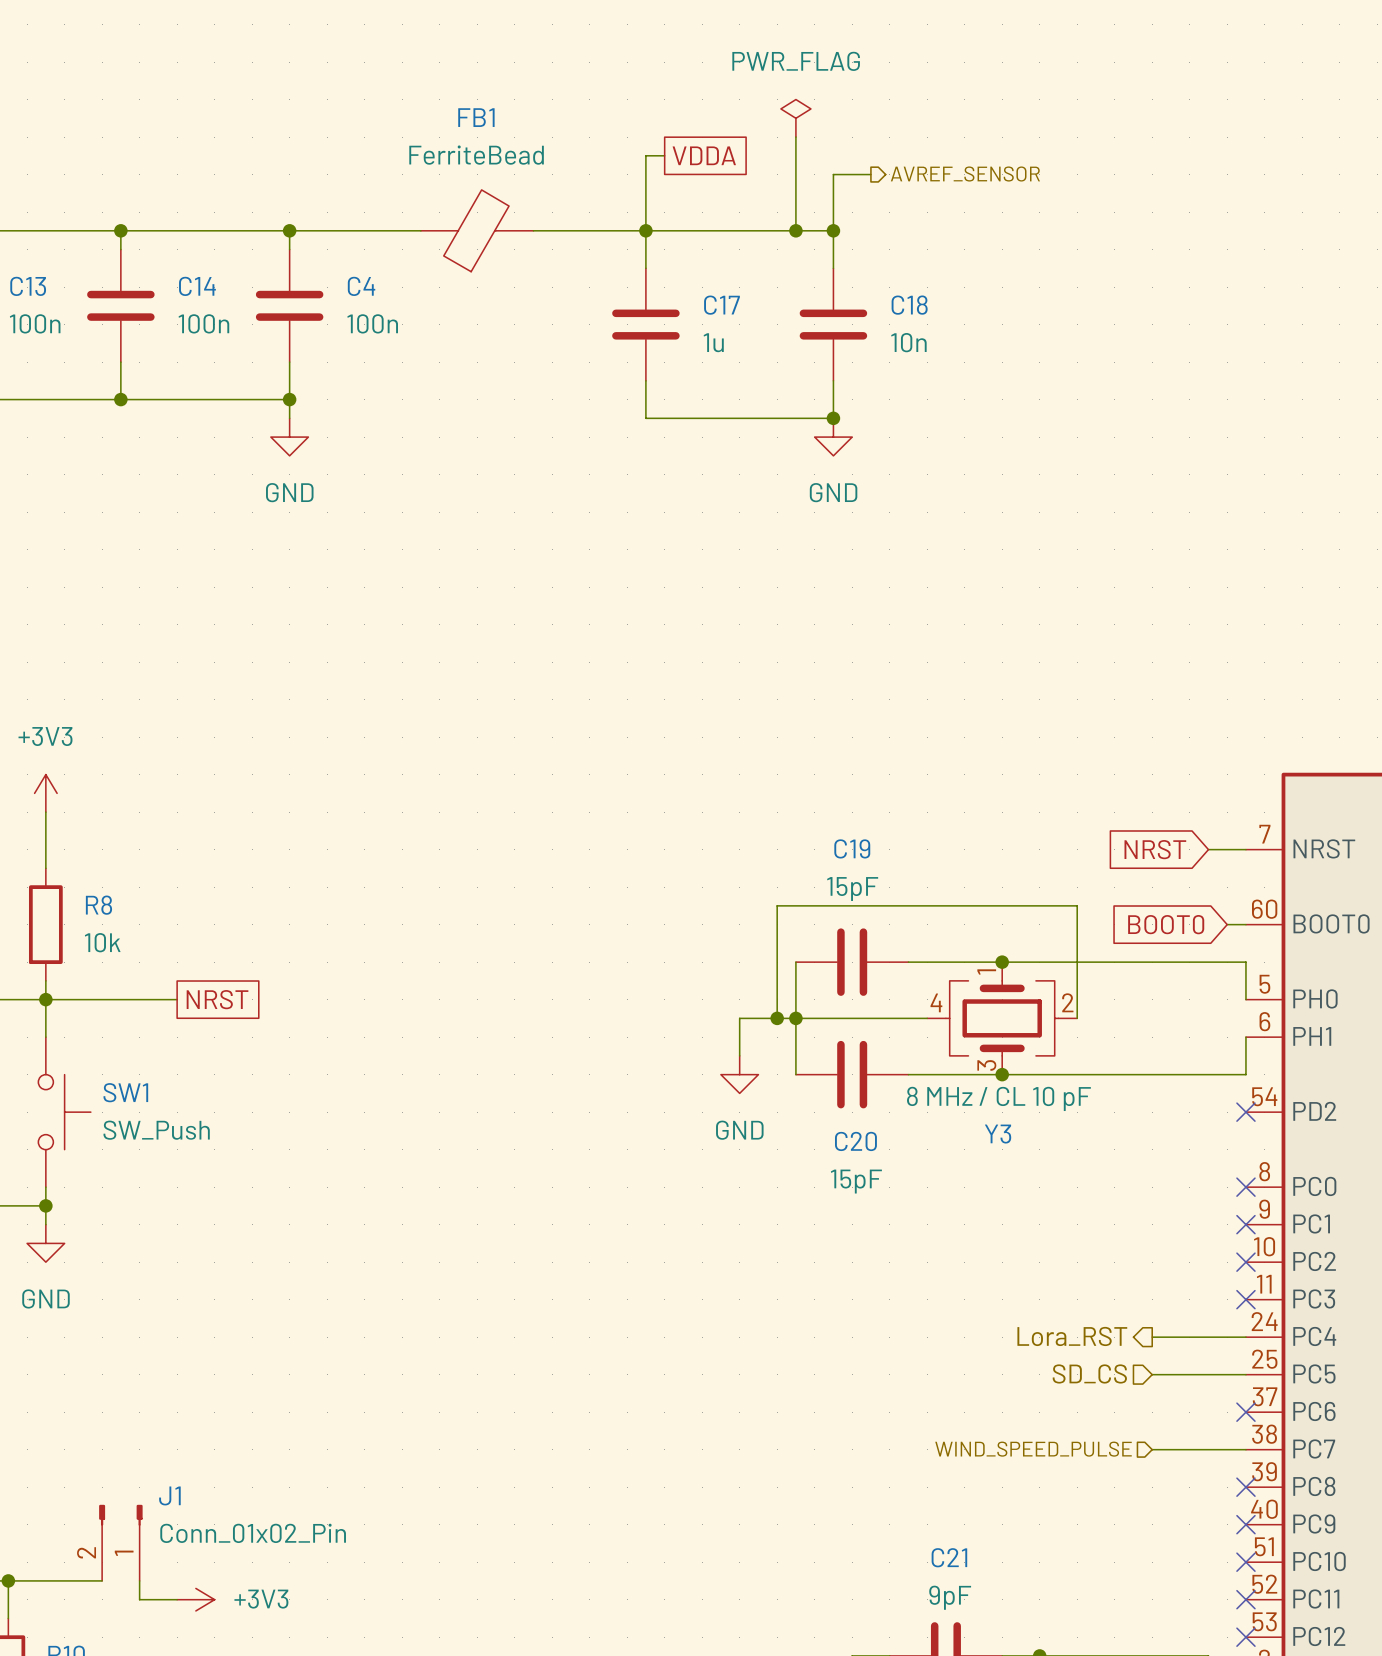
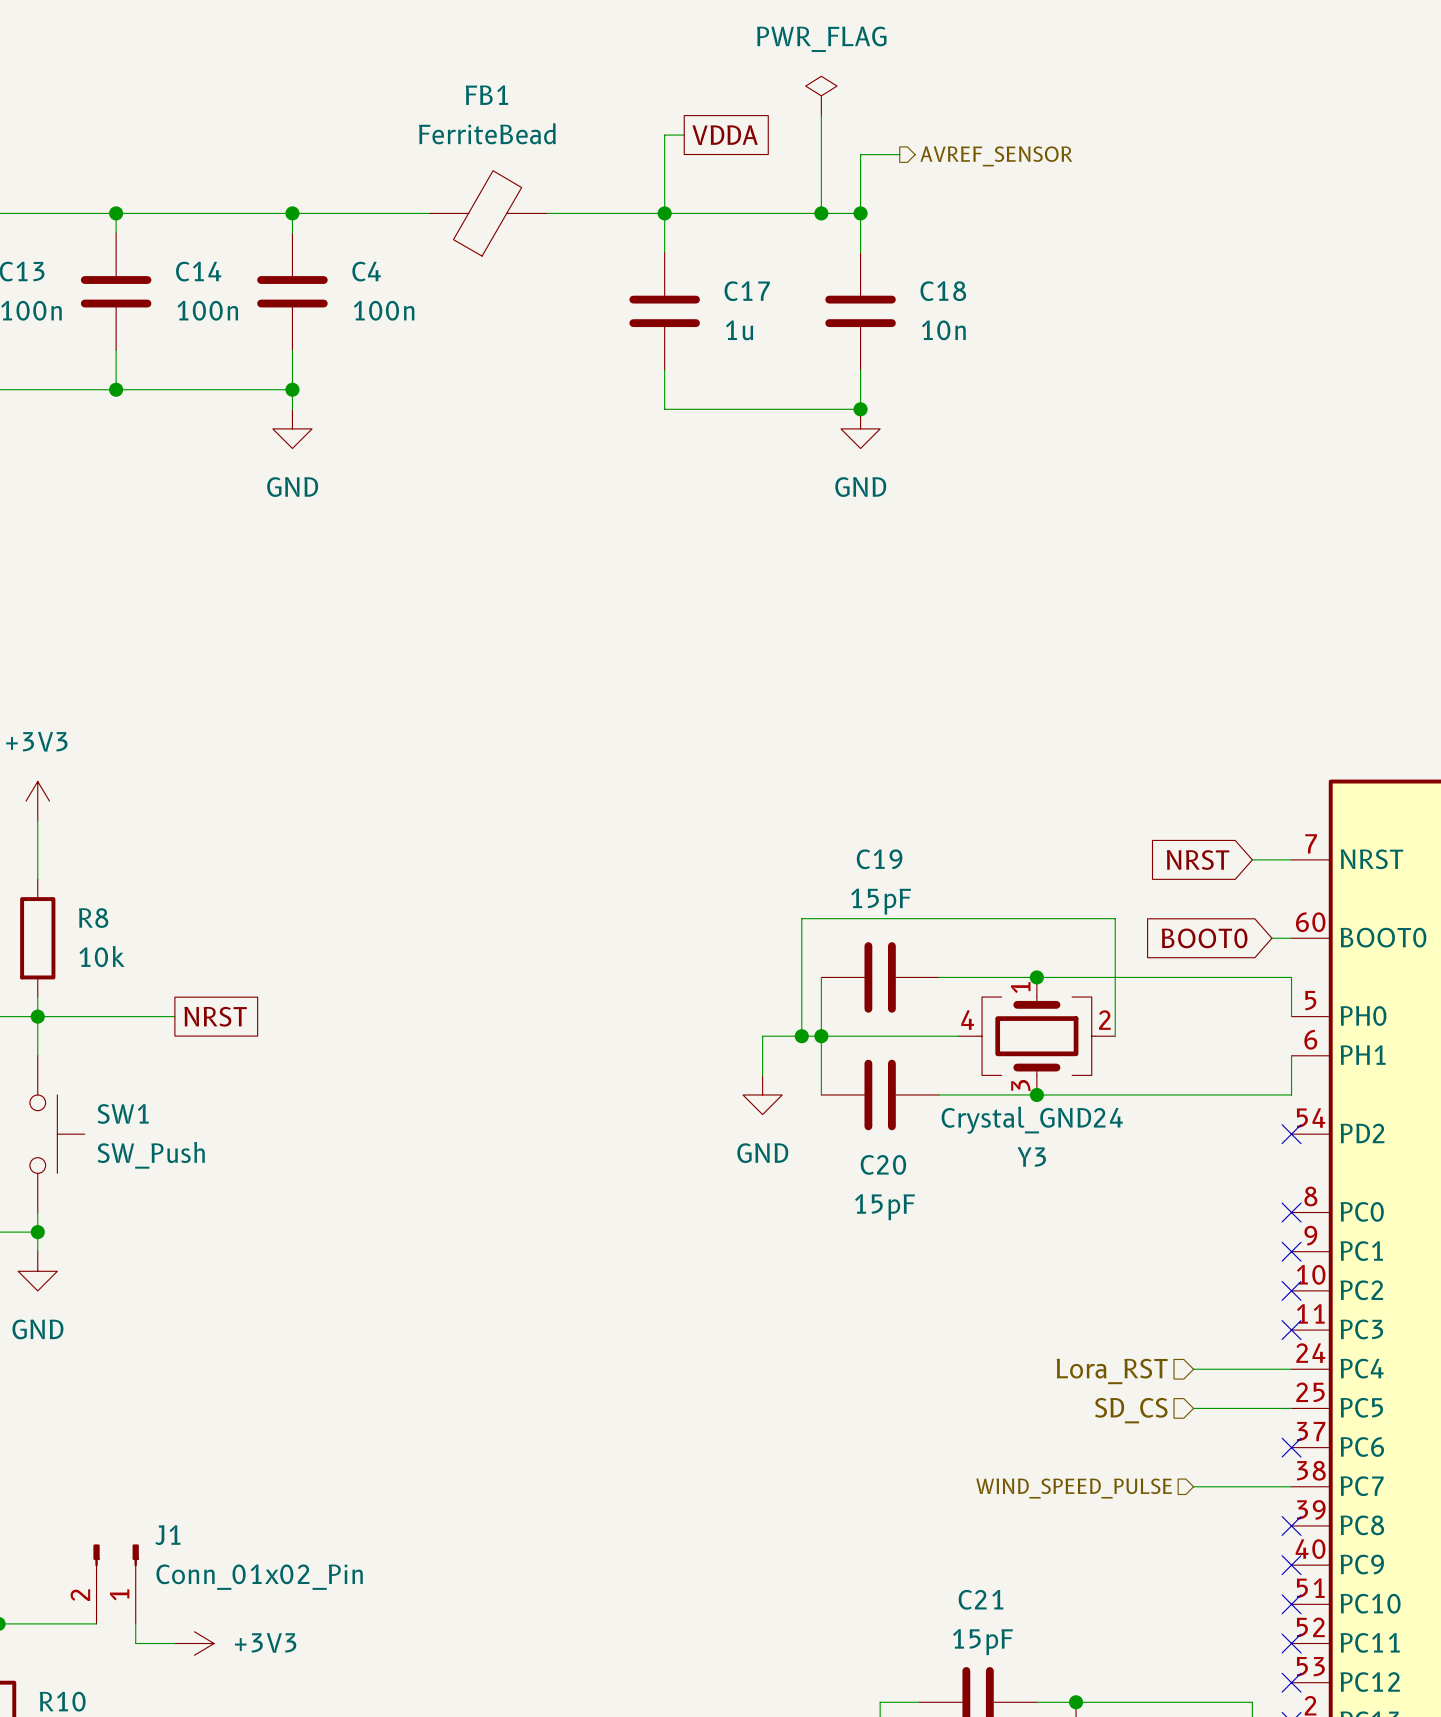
Y3 value: 8 MHz / CL 10 pF (998, 1098) -> Crystal_GND24 (1032, 1120)
hierarchical label shape: output (1072, 1336) -> input (1112, 1371)
C21 value: 9pF (950, 1597) -> 15pF (982, 1642)

